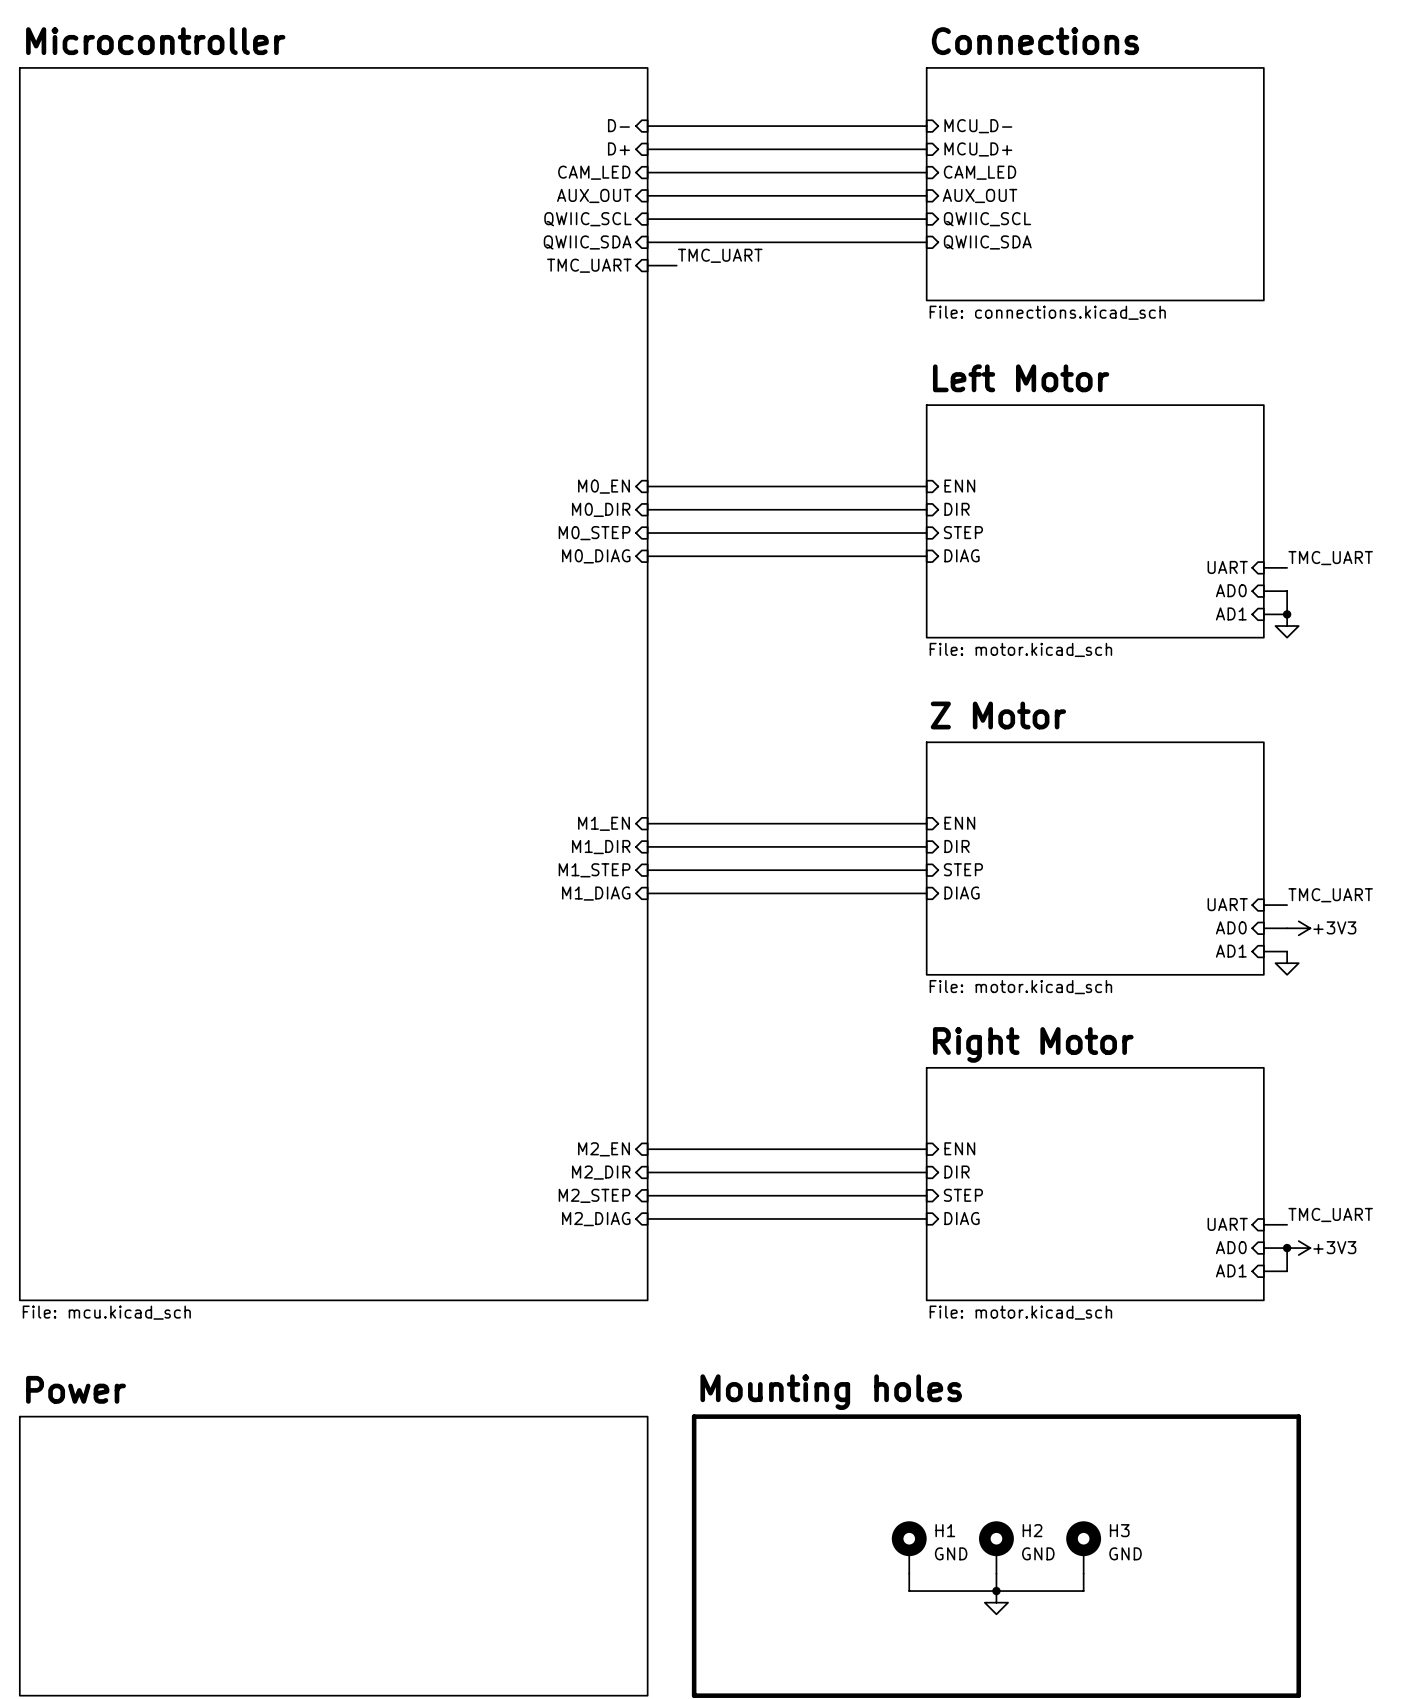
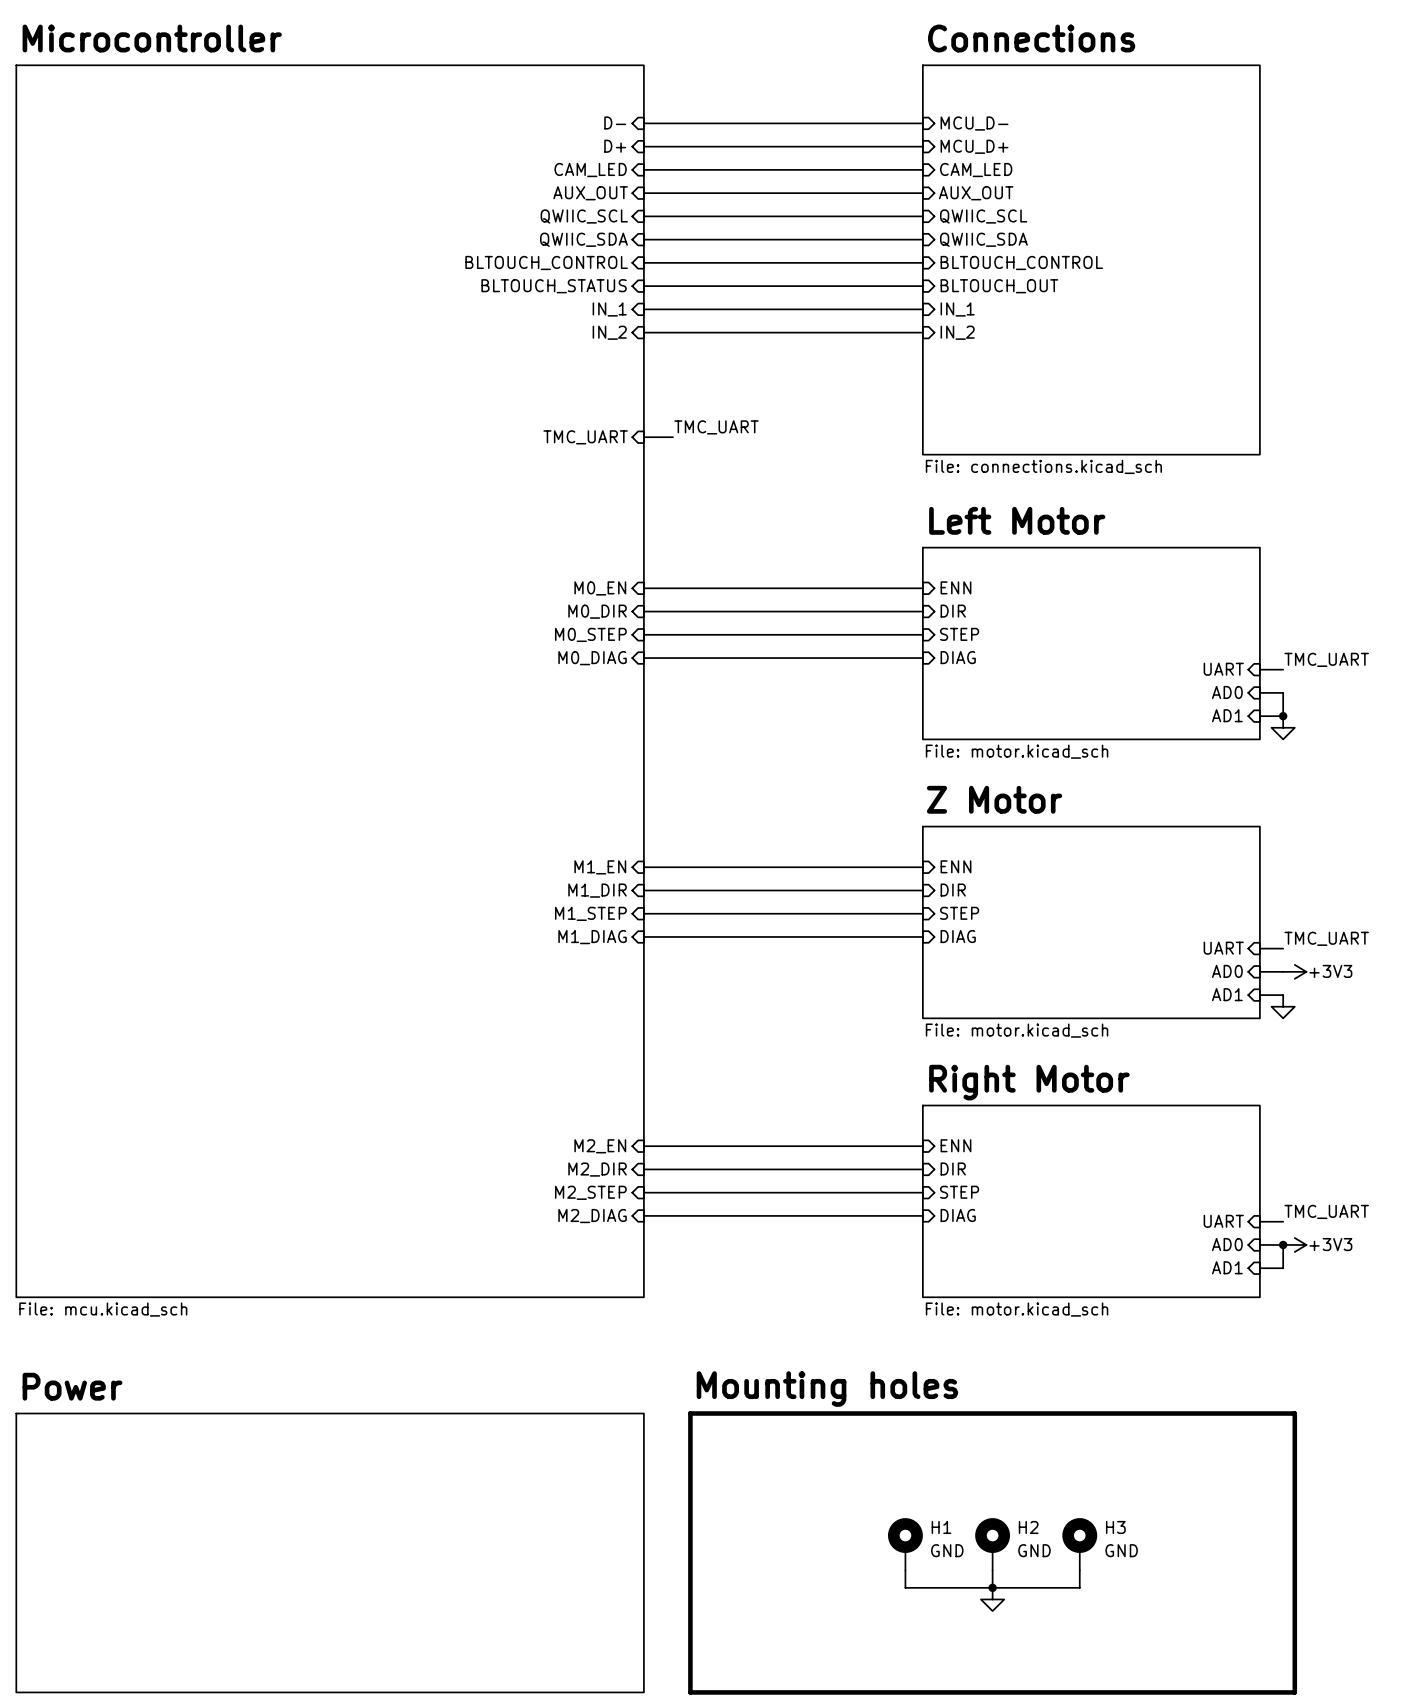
sheet Connections: File: connections.kicad_sch (1095, 184) -> none
label position: TMC_UART (720, 255) -> TMC_UART (716, 427)
sheet Connections: none -> File: connections.kicad_sch (1091, 259)
sheet pin: TMC_UART (589, 265) -> BLTOUCH_CONTROL (546, 263)
wire: none -> (672, 262) (922, 262)
sheet pin: none -> BLTOUCH_CONTROL (1021, 263)
sheet pin: none -> BLTOUCH_STATUS (554, 286)
wire: none -> (643, 286) (922, 286)
sheet pin: none -> BLTOUCH_OUT (999, 286)
sheet pin: none -> IN_1 (609, 309)
wire: none -> (643, 309) (922, 309)
sheet pin: none -> IN_1 (957, 309)
sheet pin: none -> IN_2 (609, 332)
wire: none -> (643, 332) (922, 332)
sheet pin: none -> IN_2 (957, 332)
wire: none -> (643, 437) (672, 437)
sheet pin: none -> TMC_UART (585, 437)
sheet pin position: M0_EN (604, 486) -> M0_EN (600, 588)
wire: (647, 486) (926, 486) -> (643, 588) (922, 588)
sheet pin position: ENN (959, 486) -> ENN (955, 587)
sheet pin position: M0_DIR (601, 509) -> M0_DIR (597, 611)
wire: (647, 509) (926, 509) -> (643, 611) (922, 611)
sheet pin position: DIR (957, 509) -> DIR (953, 611)
sheet Left Motor: File: motor.kicad_sch (1095, 521) -> none
sheet pin position: STEP (963, 532) -> STEP (959, 634)
sheet pin position: M0_STEP (594, 533) -> M0_STEP (590, 634)
wire: (647, 533) (926, 533) -> (643, 634) (922, 634)
sheet pin position: DIAG (962, 555) -> DIAG (958, 657)
sheet pin position: M0_DIAG (596, 556) -> M0_DIAG (592, 658)
wire: (647, 556) (926, 556) -> (643, 658) (922, 658)
label position: TMC_UART (1330, 558) -> TMC_UART (1326, 659)
sheet pin position: UART (1227, 567) -> UART (1223, 669)
wire: (1263, 567) (1287, 567) -> (1259, 669) (1283, 669)
sheet pin position: AD0 (1231, 590) -> AD0 (1227, 692)
wire: (1263, 591) (1287, 591) (1287, 614) (1263, 614) -> (1259, 692) (1283, 692) (1283, 716) (1259, 716)
sheet pin position: AD1 (1231, 613) -> AD1 (1227, 715)
junction: (1287, 614) -> none
power symbol position: (1287, 626) -> (1283, 727)
sheet Left Motor: none -> File: motor.kicad_sch (1091, 643)
junction: none -> (1283, 716)
sheet pin: M1_EN (604, 823) -> none
wire: (647, 823) (926, 823) -> (643, 936) (922, 936)
sheet pin: ENN (959, 823) -> none
wire: (647, 846) (926, 846) -> (643, 913) (922, 913)
sheet pin: DIR (957, 846) -> none
sheet pin: M1_DIR (601, 847) -> none
sheet Z Motor: File: motor.kicad_sch (1095, 858) -> none
sheet pin: STEP (963, 869) -> ENN (955, 866)
sheet pin: M1_STEP (594, 870) -> M1_EN (600, 867)
sheet pin: M1_DIAG (596, 893) -> M1_DIR (597, 890)
sheet pin: DIAG (962, 893) -> DIR (953, 890)
label position: TMC_UART (1330, 895) -> TMC_UART (1326, 938)
sheet pin: UART (1227, 904) -> none
wire: (1263, 905) (1287, 905) -> (1259, 971) (1283, 971)
sheet pin: none -> M1_STEP (590, 913)
sheet pin: none -> STEP (959, 913)
sheet Z Motor: none -> File: motor.kicad_sch (1091, 922)
sheet pin position: AD0 (1231, 927) -> AD0 (1227, 971)
wire: (1263, 928) (1287, 928) -> (1259, 995) (1283, 995)
power symbol position: +3V3 (1298, 928) -> +3V3 (1294, 971)
sheet pin: none -> DIAG (958, 936)
sheet pin: none -> M1_DIAG (592, 937)
sheet pin: AD1 (1231, 951) -> UART (1223, 948)
power symbol position: (1287, 963) -> (1283, 1006)
sheet pin: none -> AD1 (1227, 994)
sheet Right Motor: File: motor.kicad_sch (1095, 1184) -> none
sheet Right Motor: none -> File: motor.kicad_sch (1091, 1201)

